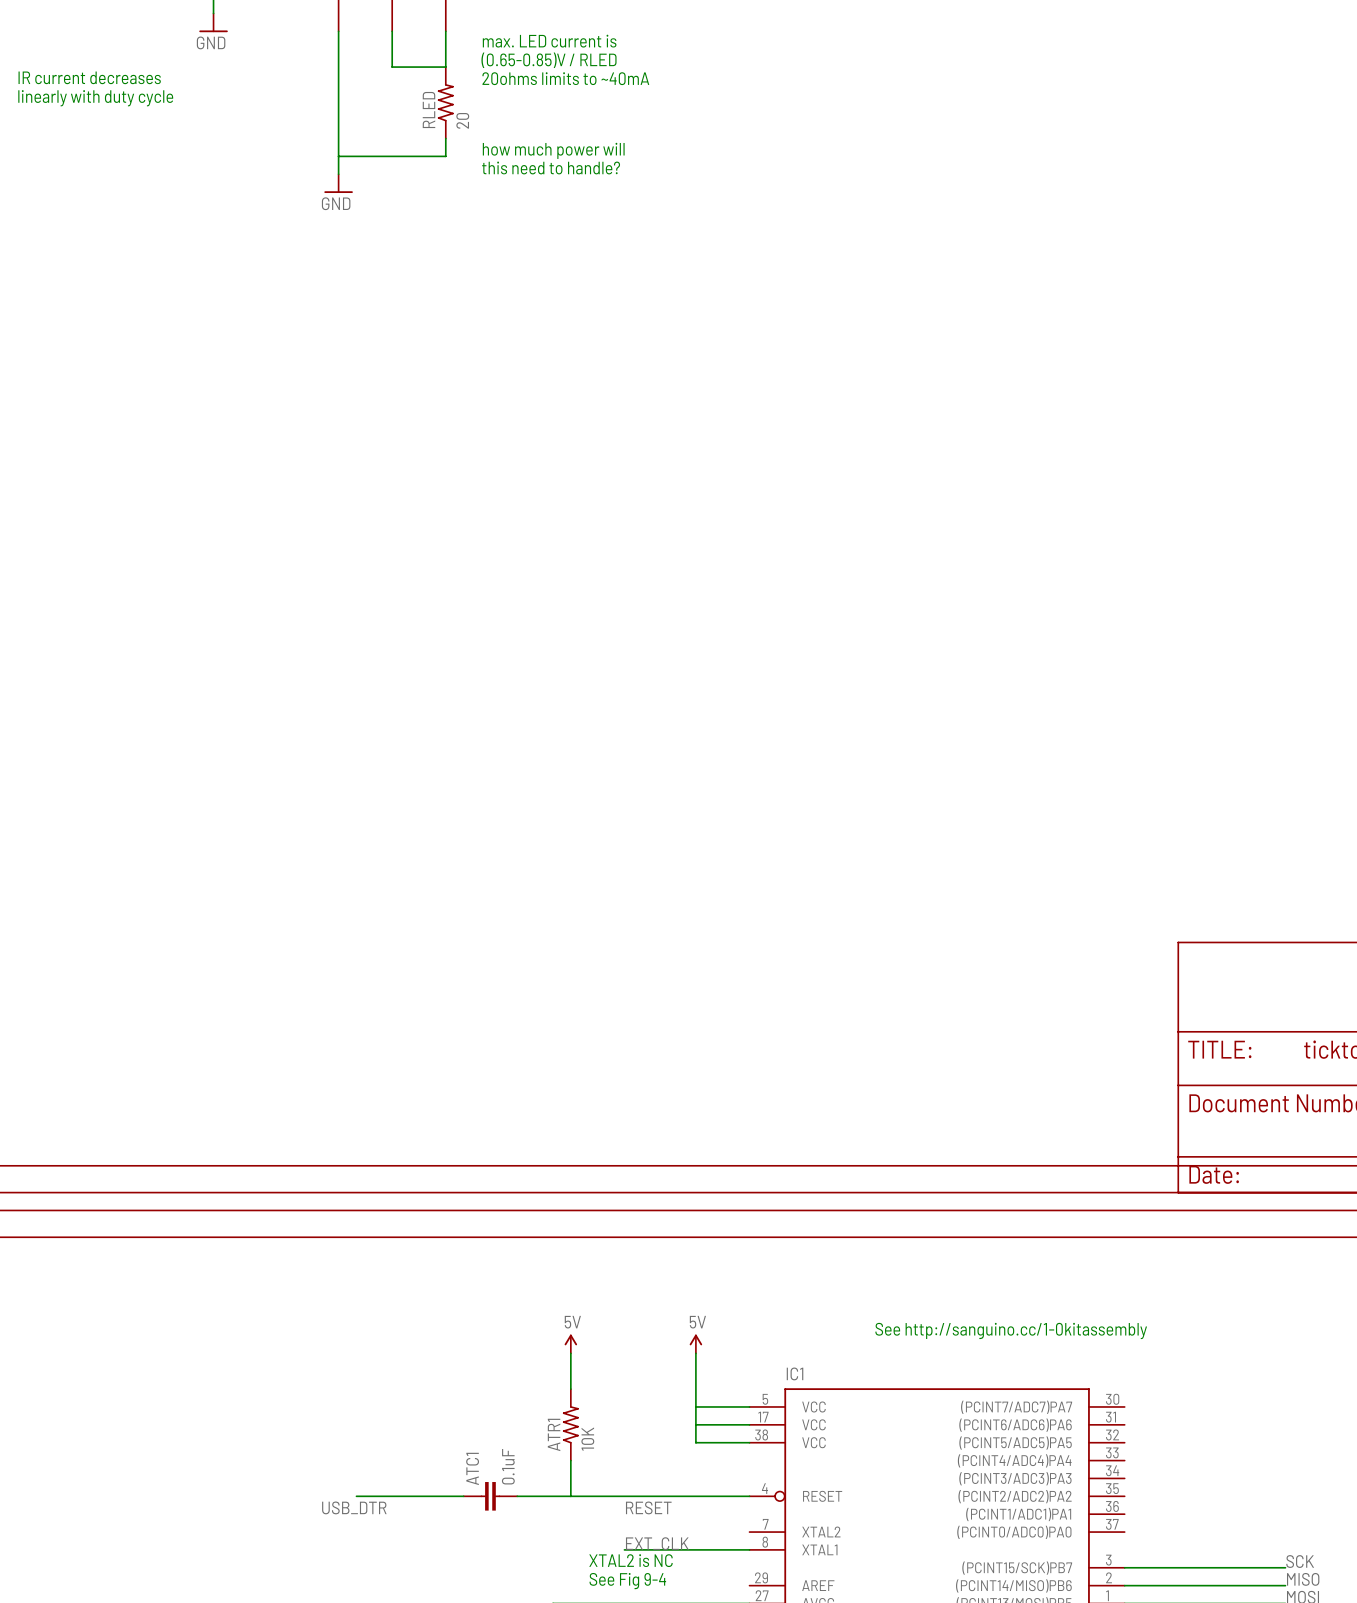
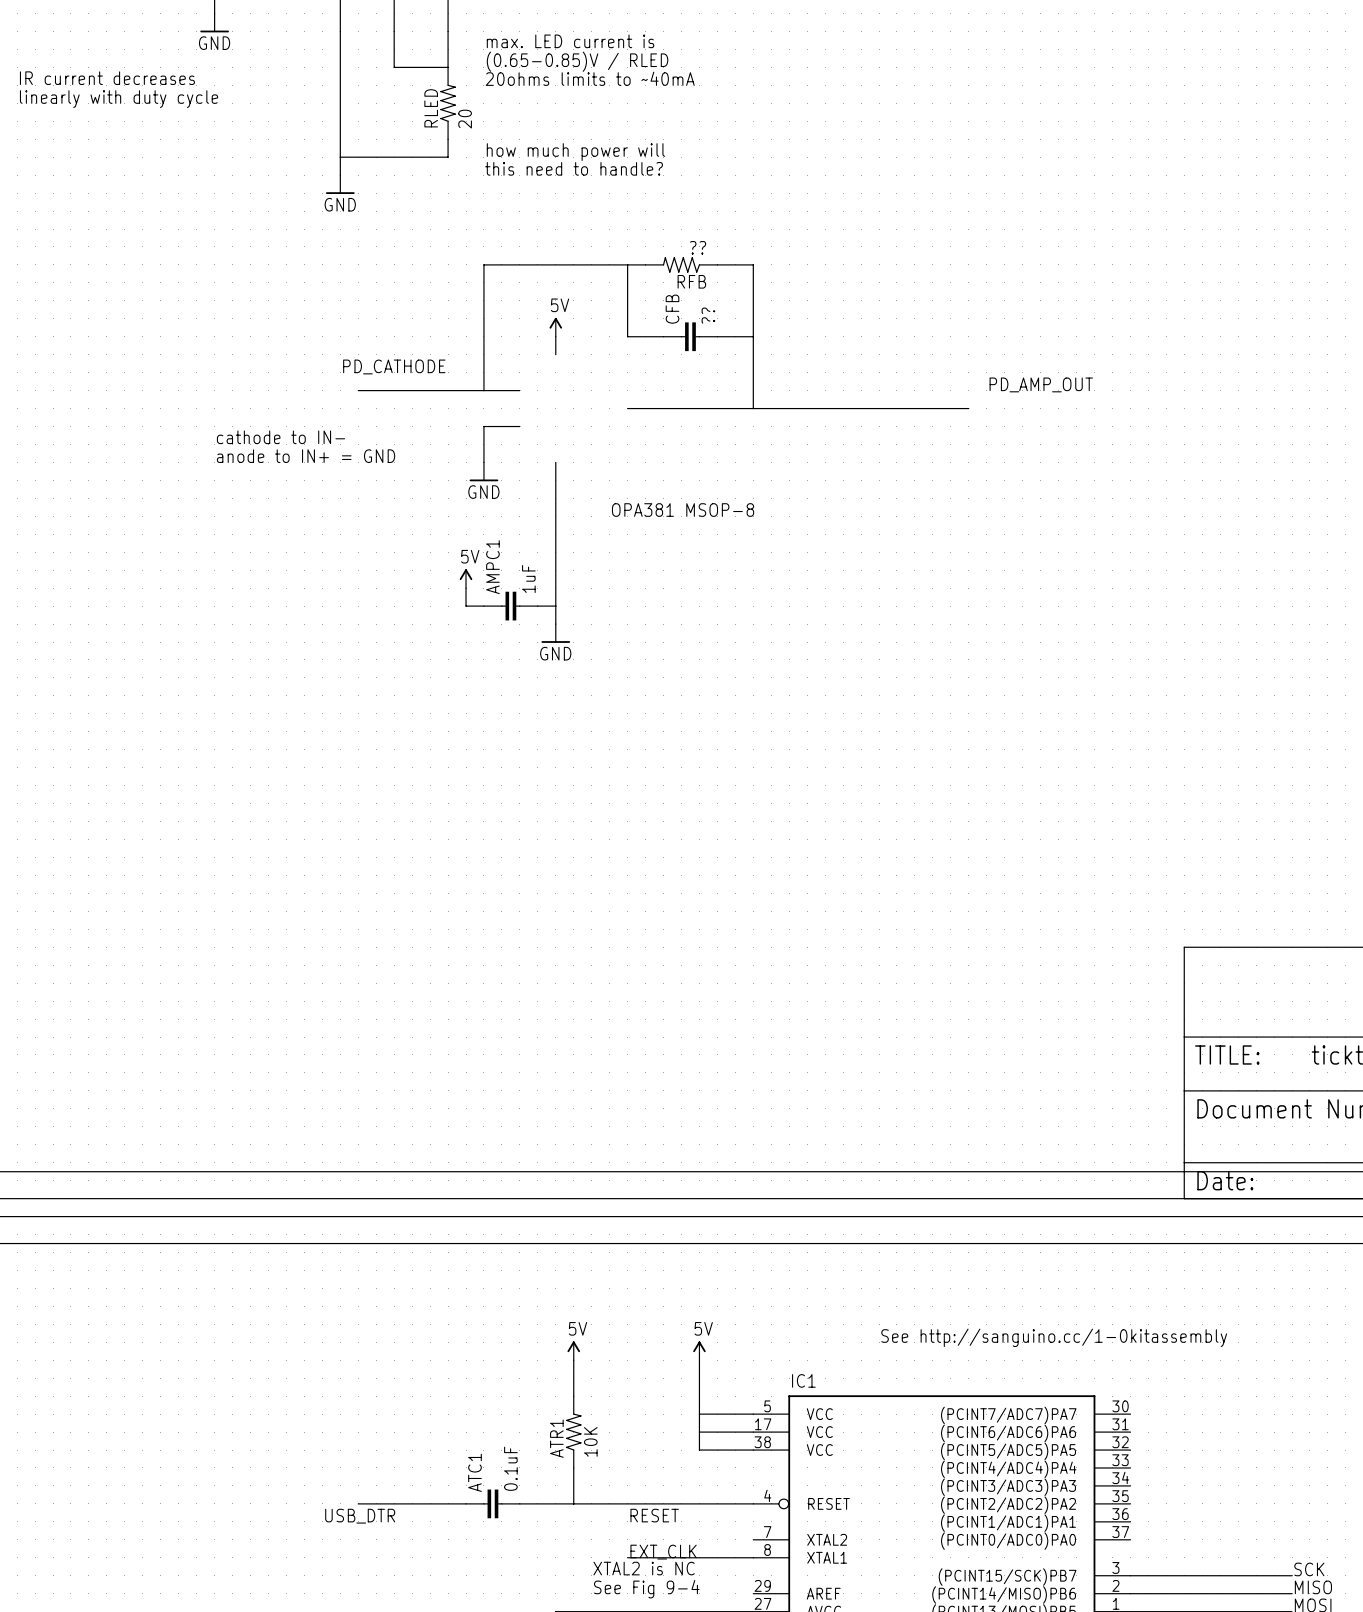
wire: none -> (627, 264) (627, 336) (663, 336)
wire: none -> (645, 264) (483, 264) (483, 390)
RFB: none -> ?? (681, 264)
wire: none -> (717, 264) (753, 264) (753, 408)
power symbol: none -> 5V (555, 327)
wire: none -> (555, 336) (555, 354)
CFB: none -> ?? (690, 336)
wire: none -> (717, 336) (753, 336)
label: none -> PD_CATHODE (394, 366)
label: none -> PD_AMP_OUT (1041, 384)
wire: none -> (358, 390) (519, 390)
wire: none -> (627, 408) (968, 408)
wire: none -> (519, 426) (483, 426) (483, 462)
text: none -> cathode to IN- (281, 437)
text: none -> anode to IN+ = GND (306, 456)
wire: none -> (555, 462) (555, 624)
power symbol: none -> GND (483, 471)
text: none -> OPA381 MSOP-8 (683, 510)
power symbol: none -> 5V (466, 578)
wire: none -> (466, 588) (466, 606) (483, 606)
AMPC1: none -> 1uF (510, 606)
wire: none -> (537, 606) (555, 606)
power symbol: none -> GND (555, 633)

